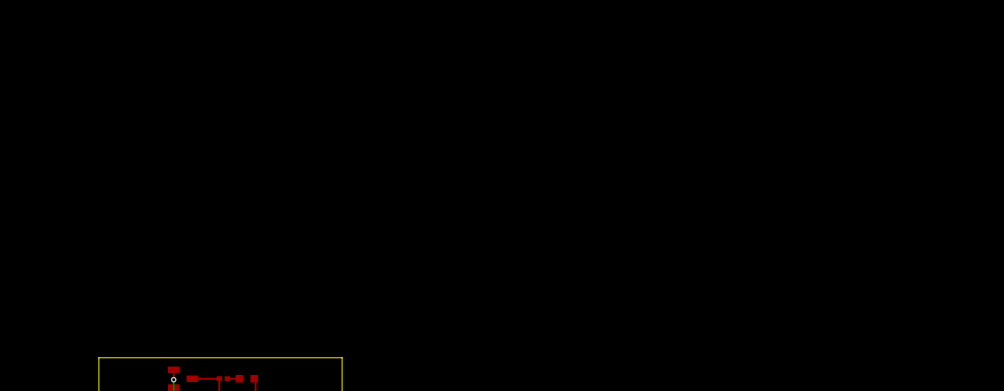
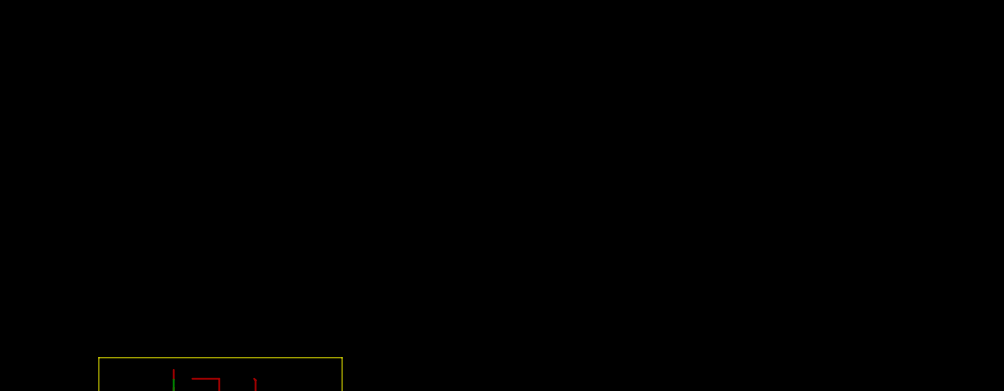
part: (183, 378) -> none
part: (223, 378) -> none
top track: (239, 378) (227, 378) -> none
part: (246, 378) -> none
via: (173, 379) -> none

